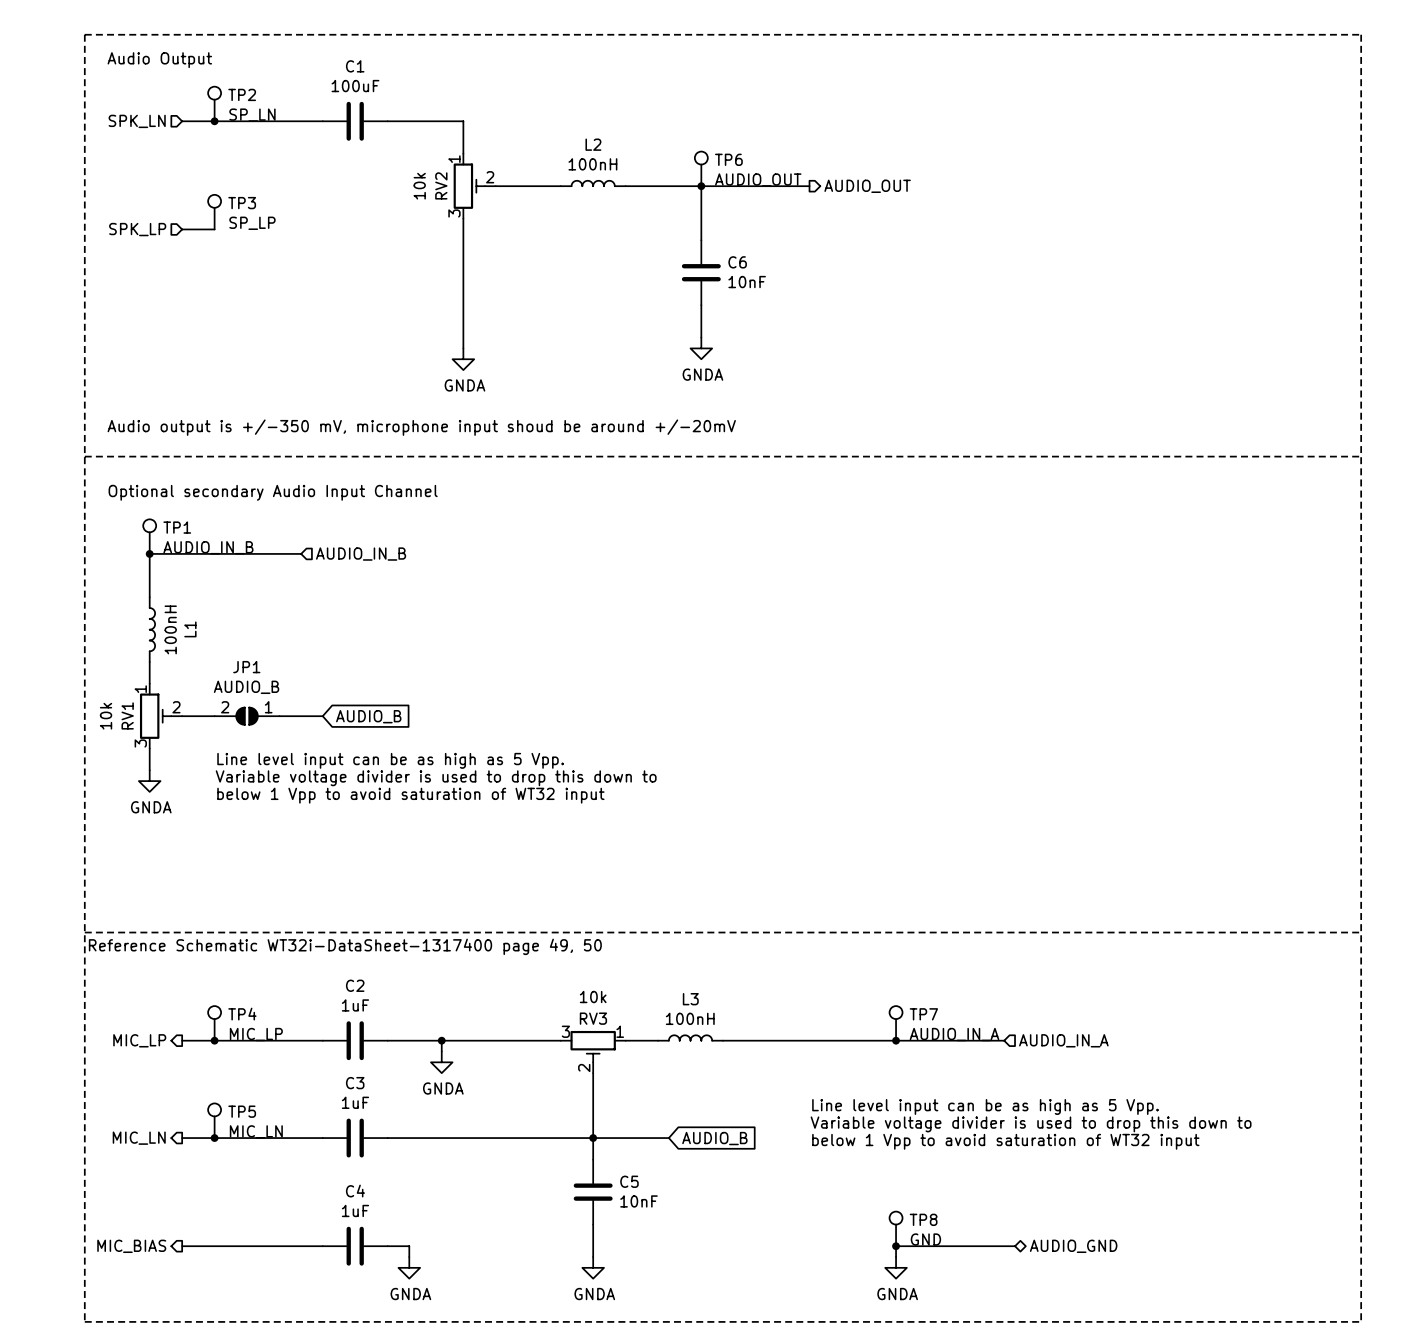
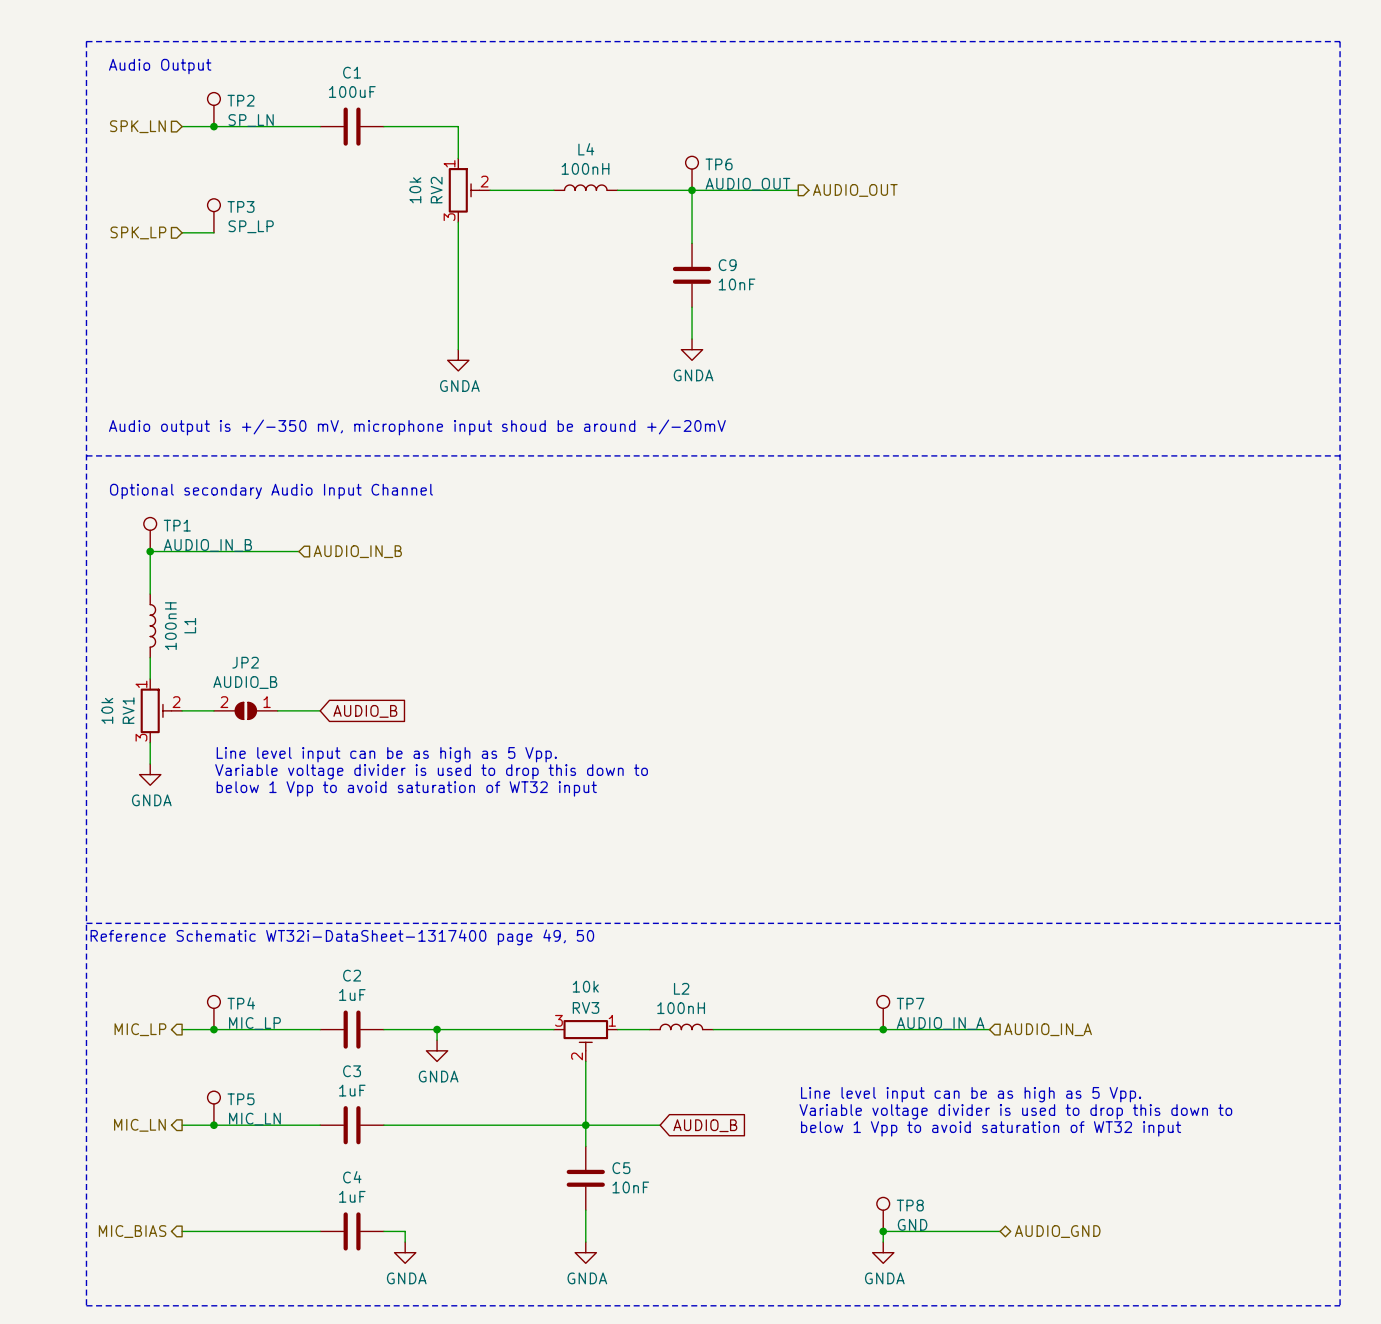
L2 name: L2 (593, 144) -> L4 (586, 149)
C6 name: C6 (737, 262) -> C9 (727, 265)
JP1 name: JP1 (246, 667) -> JP2 (245, 662)
L3 name: L3 (690, 999) -> L2 (681, 988)

